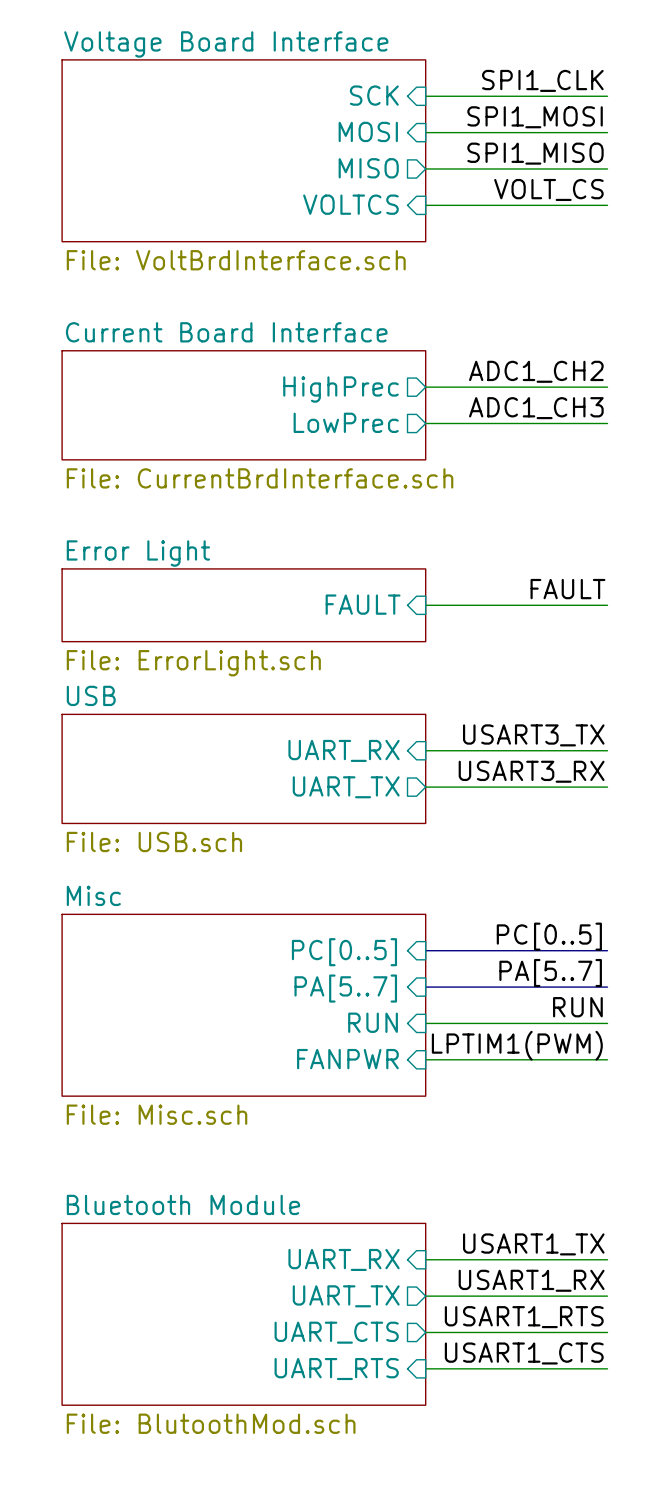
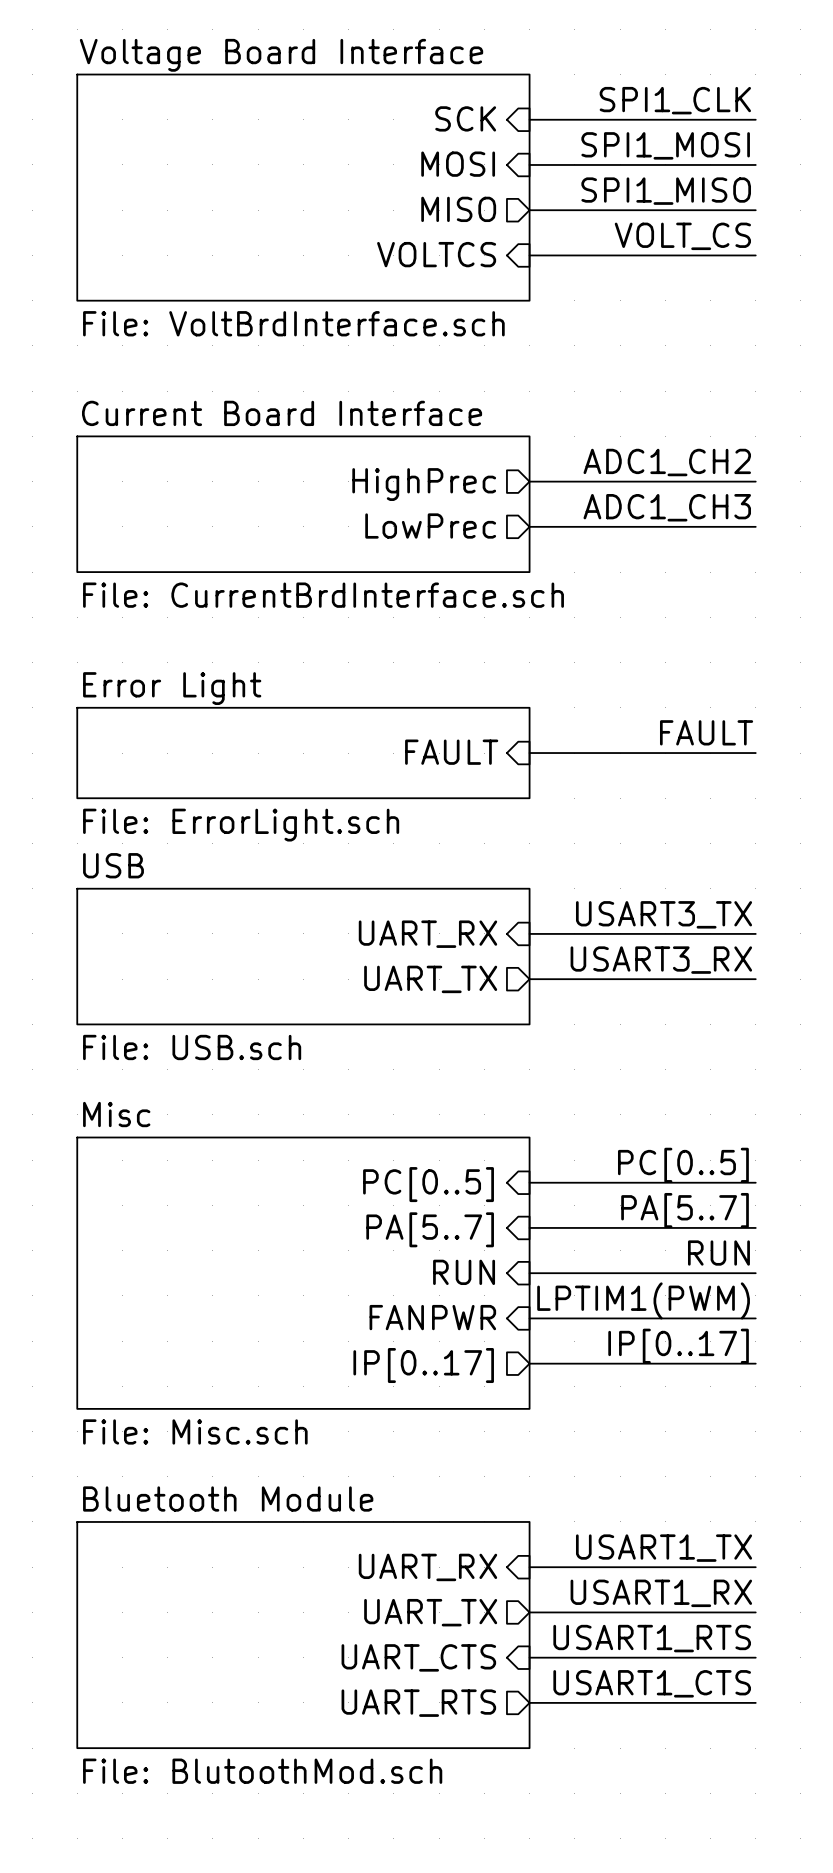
sheet Misc: File: Misc.sch (243, 1005) -> none
sheet Misc: none -> File: Misc.sch (303, 1273)
label: none -> IP[0..17] (678, 1346)
bus: none -> (529, 1363) (755, 1363)
sheet pin: none -> IP[0..17] (423, 1365)
sheet pin shape: output (336, 1332) -> input (418, 1657)
sheet pin shape: input (336, 1369) -> output (418, 1703)

